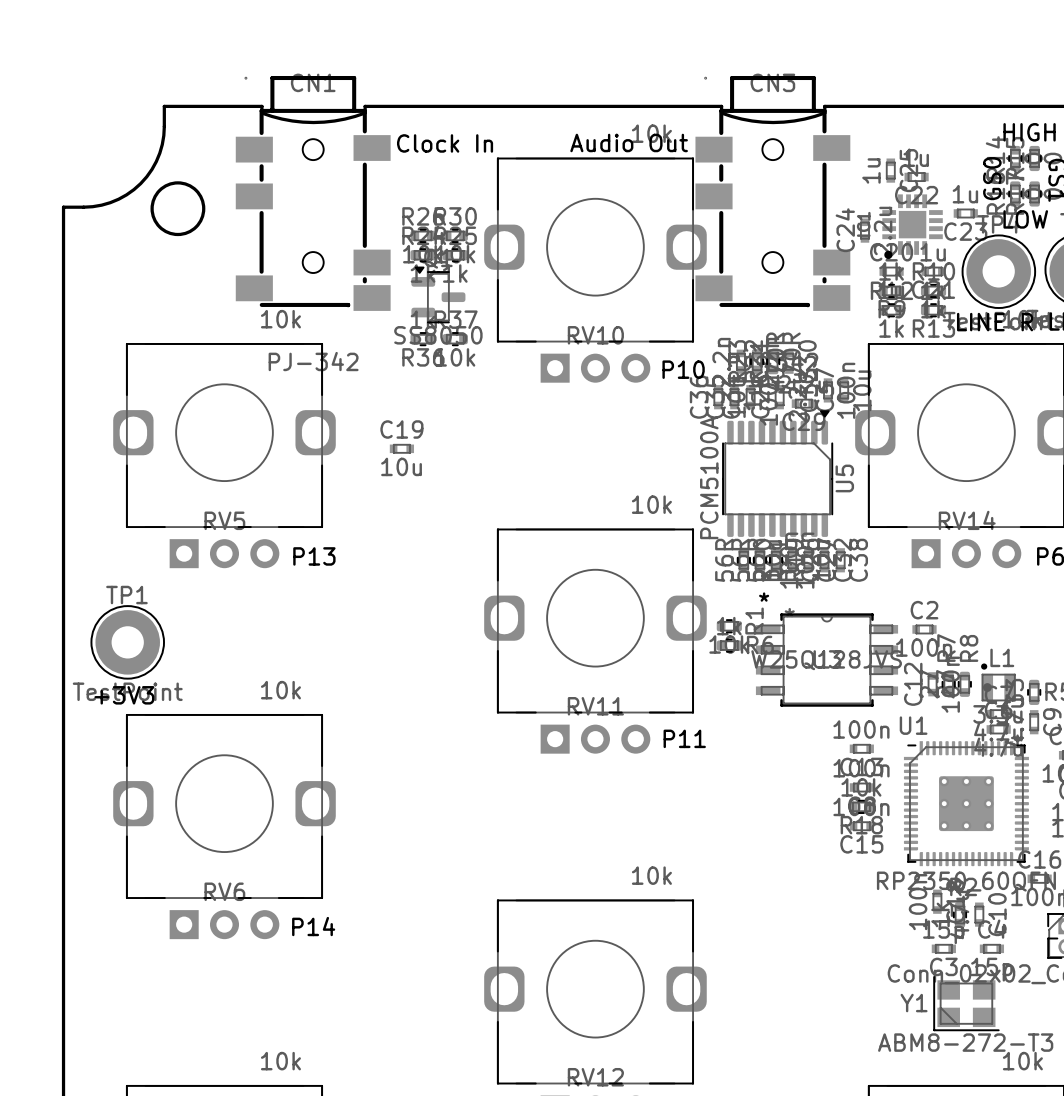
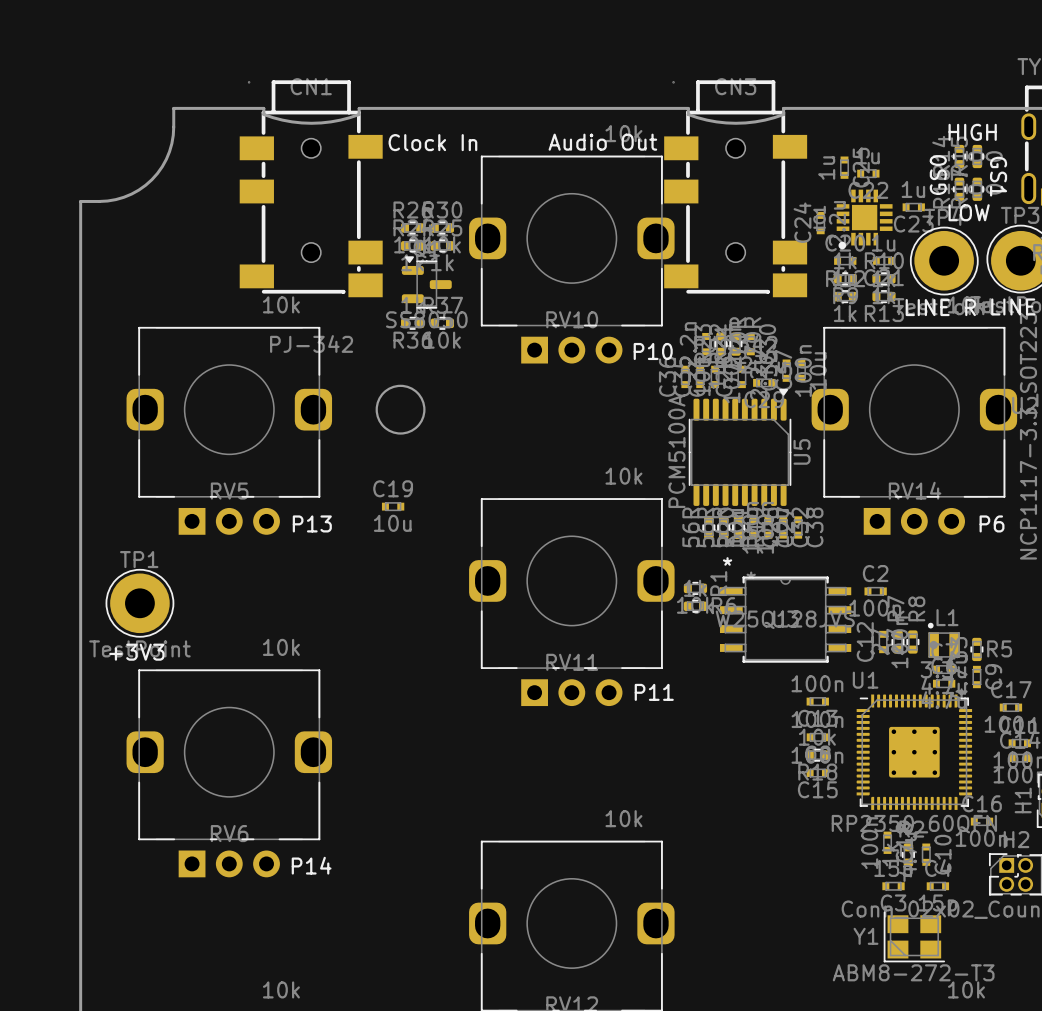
round board edge: [150, 181, 206, 237] -> none
round board edge: none -> [375, 384, 426, 435]
C19 position: (401, 448) -> (393, 506)

